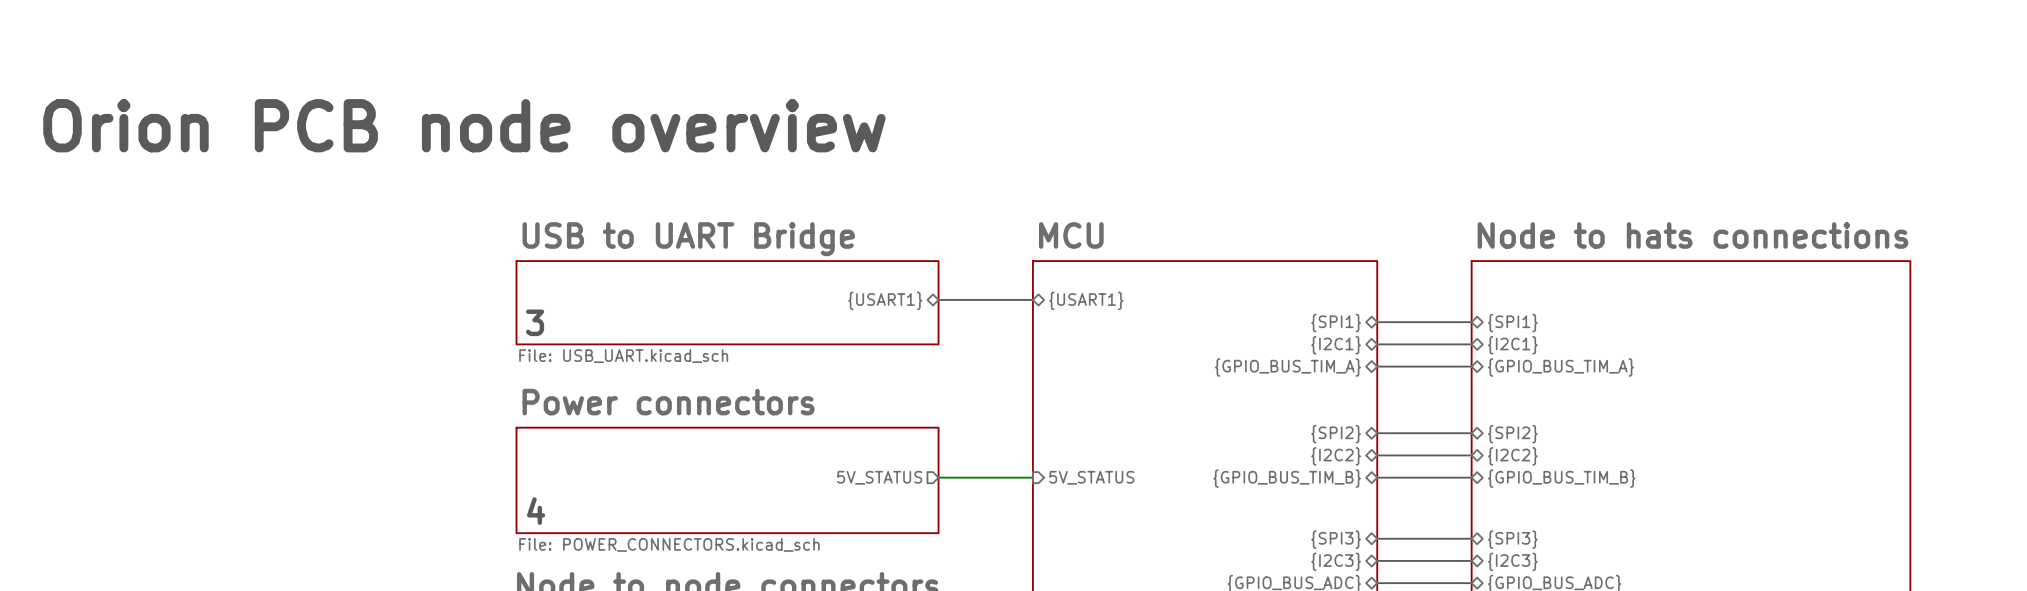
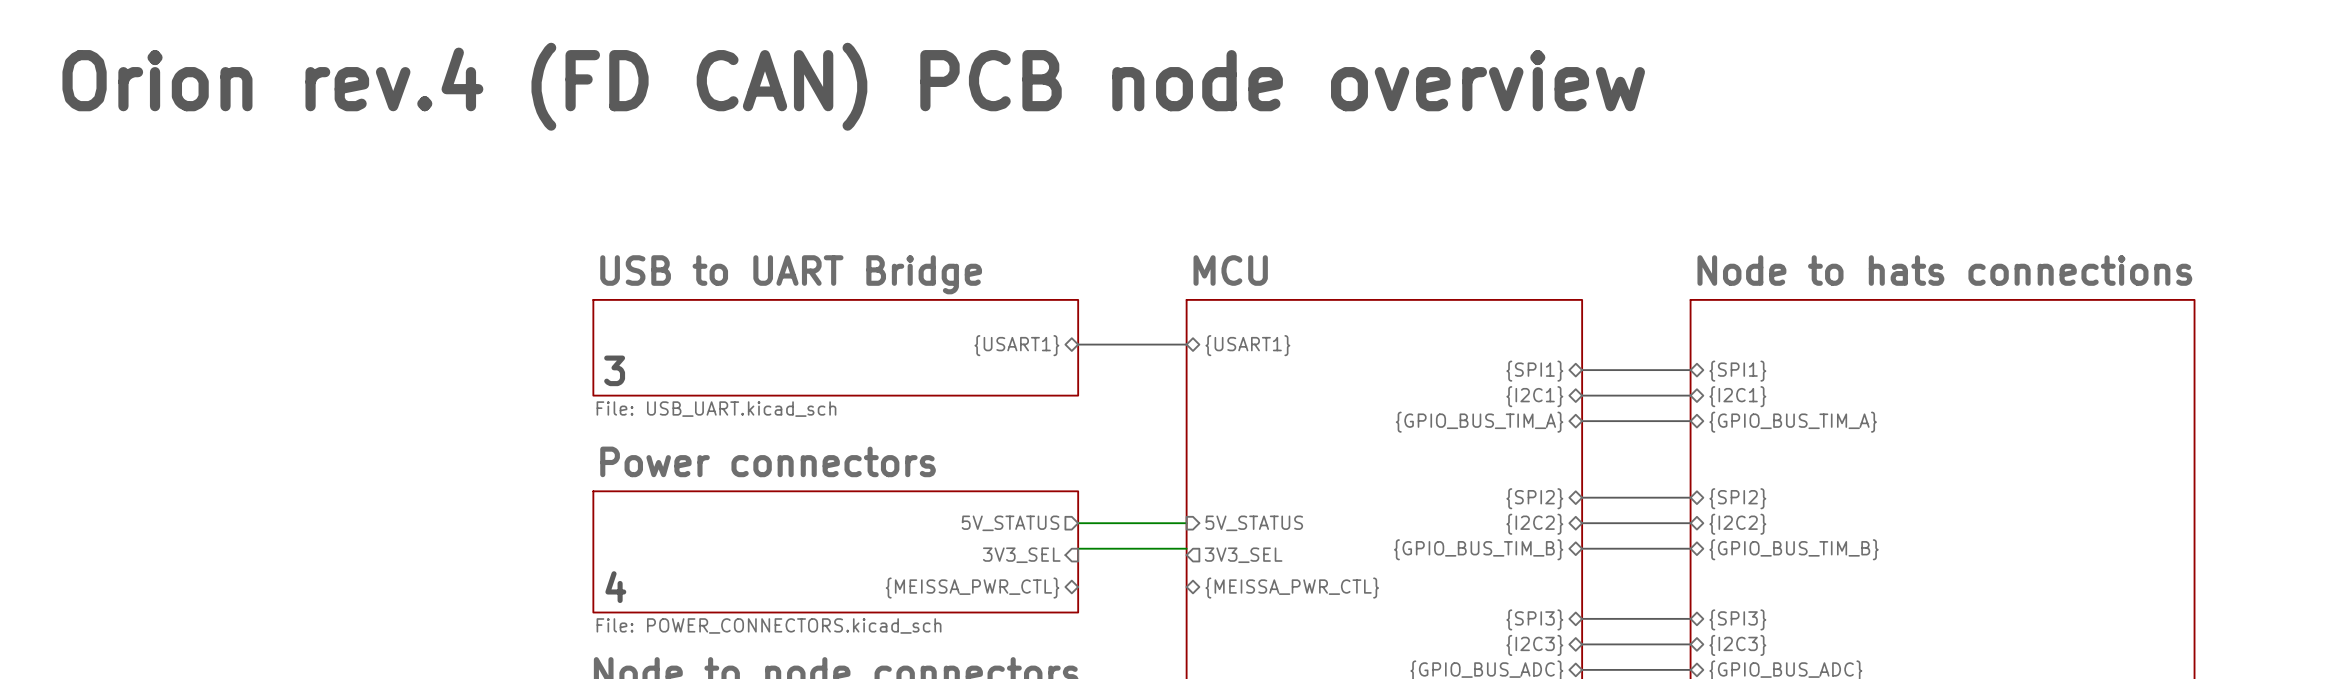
text: Orion PCB node overview (464, 125) -> Orion rev.4 (FD CAN) PCB node overview (853, 86)
wire: none -> (1078, 523) (1186, 523)
sheet pin position: 5V_STATUS (879, 477) -> 5V_STATUS (1010, 523)
sheet pin position: 5V_STATUS (1091, 477) -> 5V_STATUS (1254, 523)
sheet pin: none -> 3V3_SEL (1021, 555)
sheet pin: none -> 3V3_SEL (1243, 555)
sheet pin: none -> {MEISSA_PWR_CTL} (972, 588)
sheet pin: none -> {MEISSA_PWR_CTL} (1292, 588)

